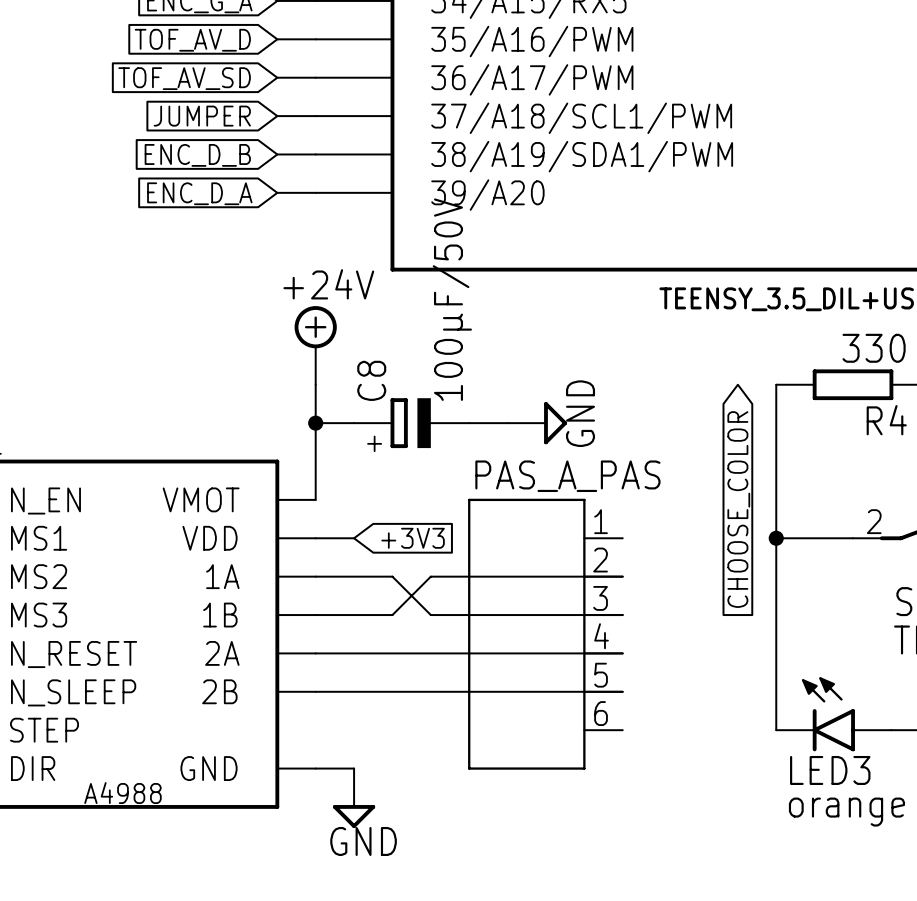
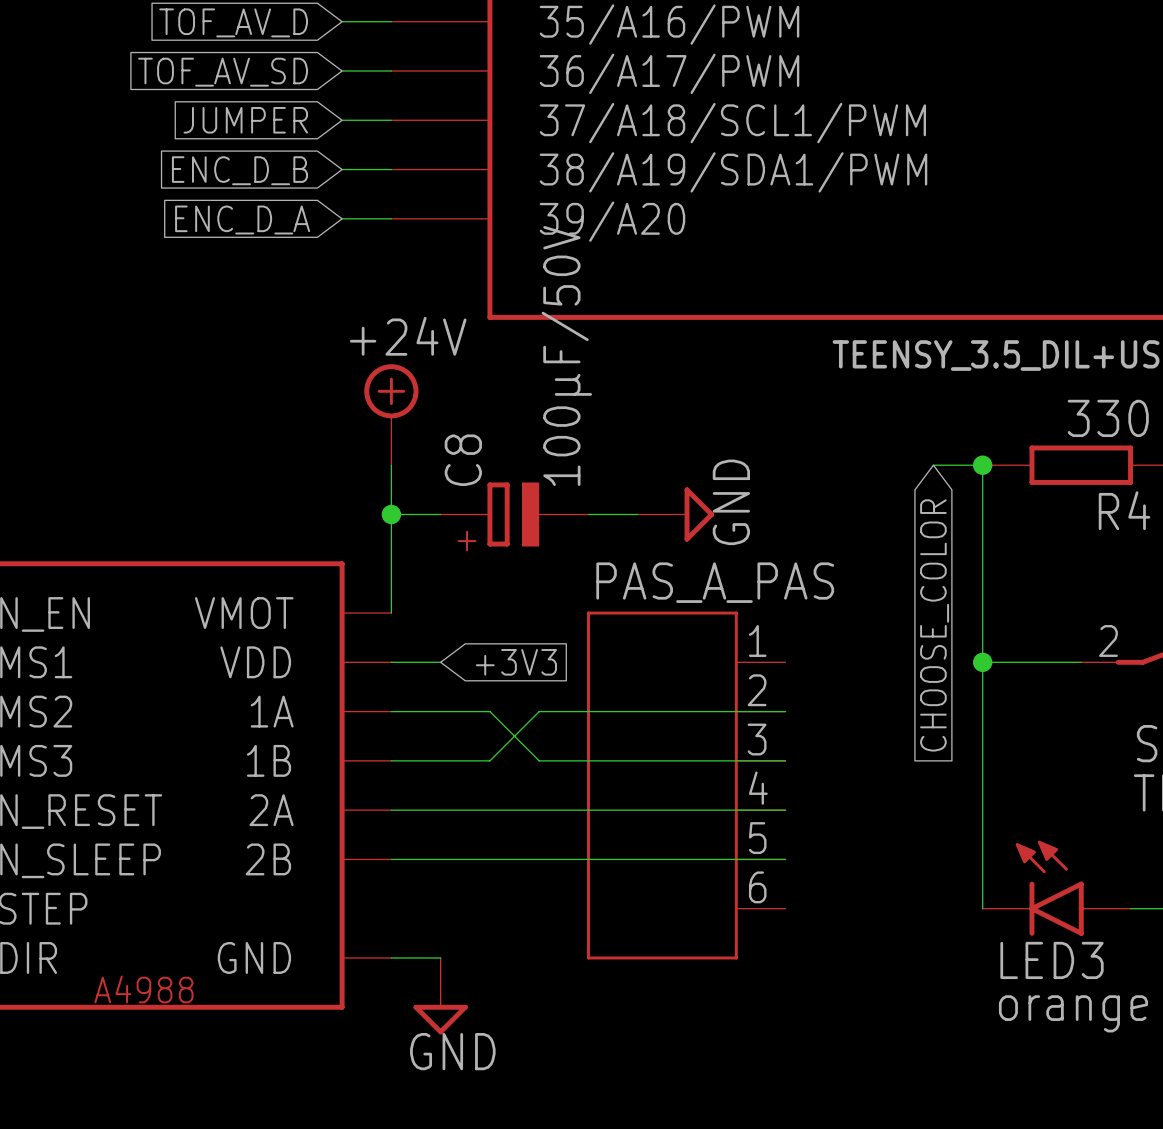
wire: none -> (933, 465) (982, 465)
junction: none -> (982, 465)

